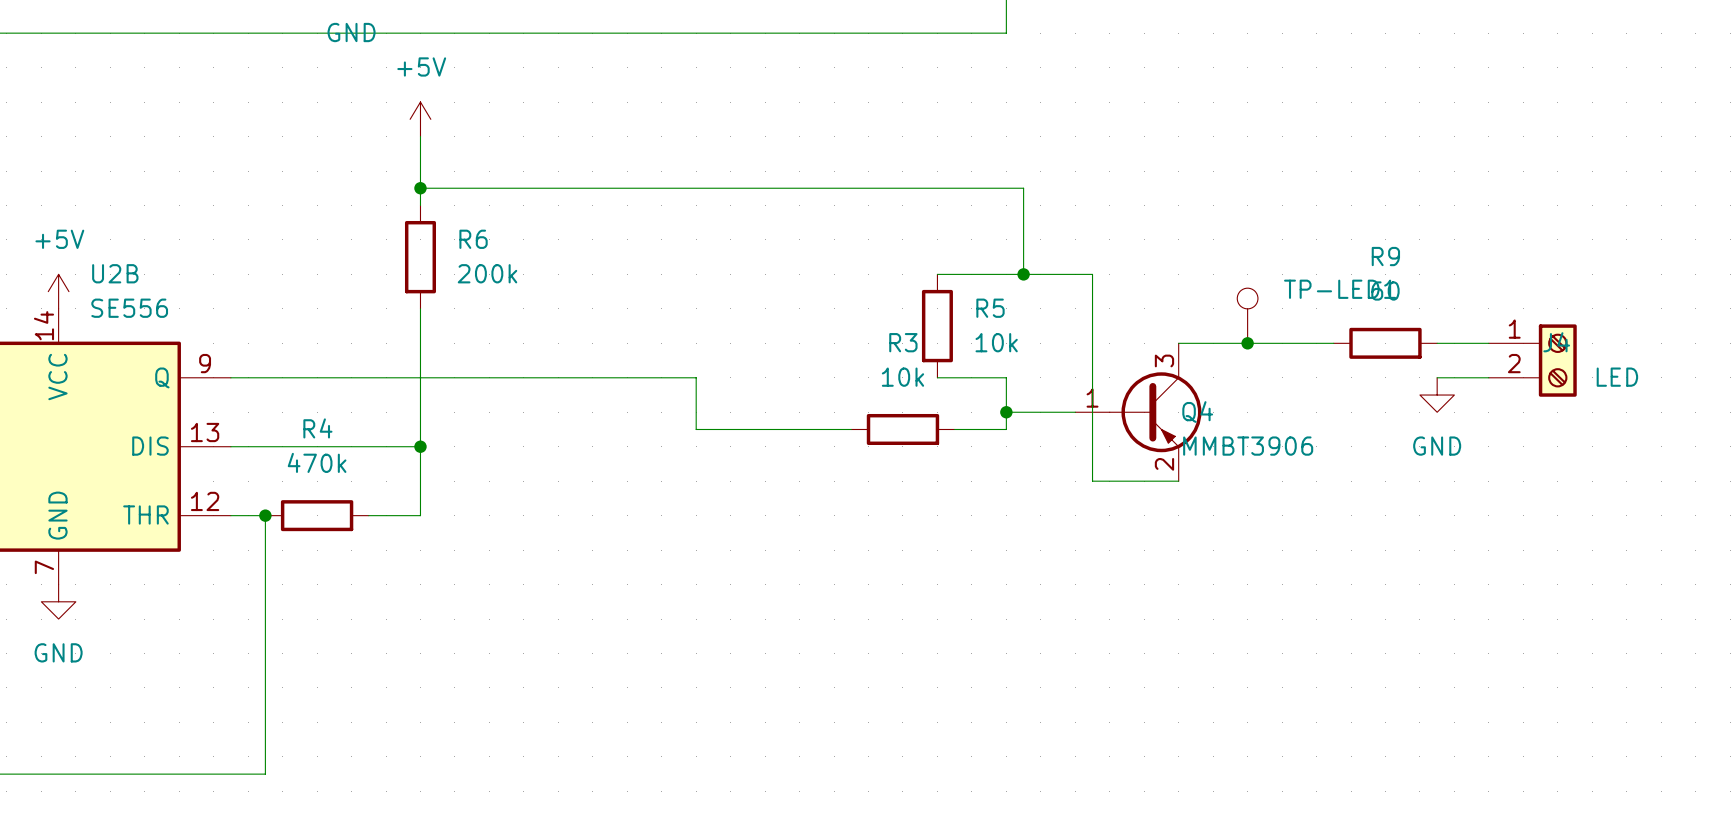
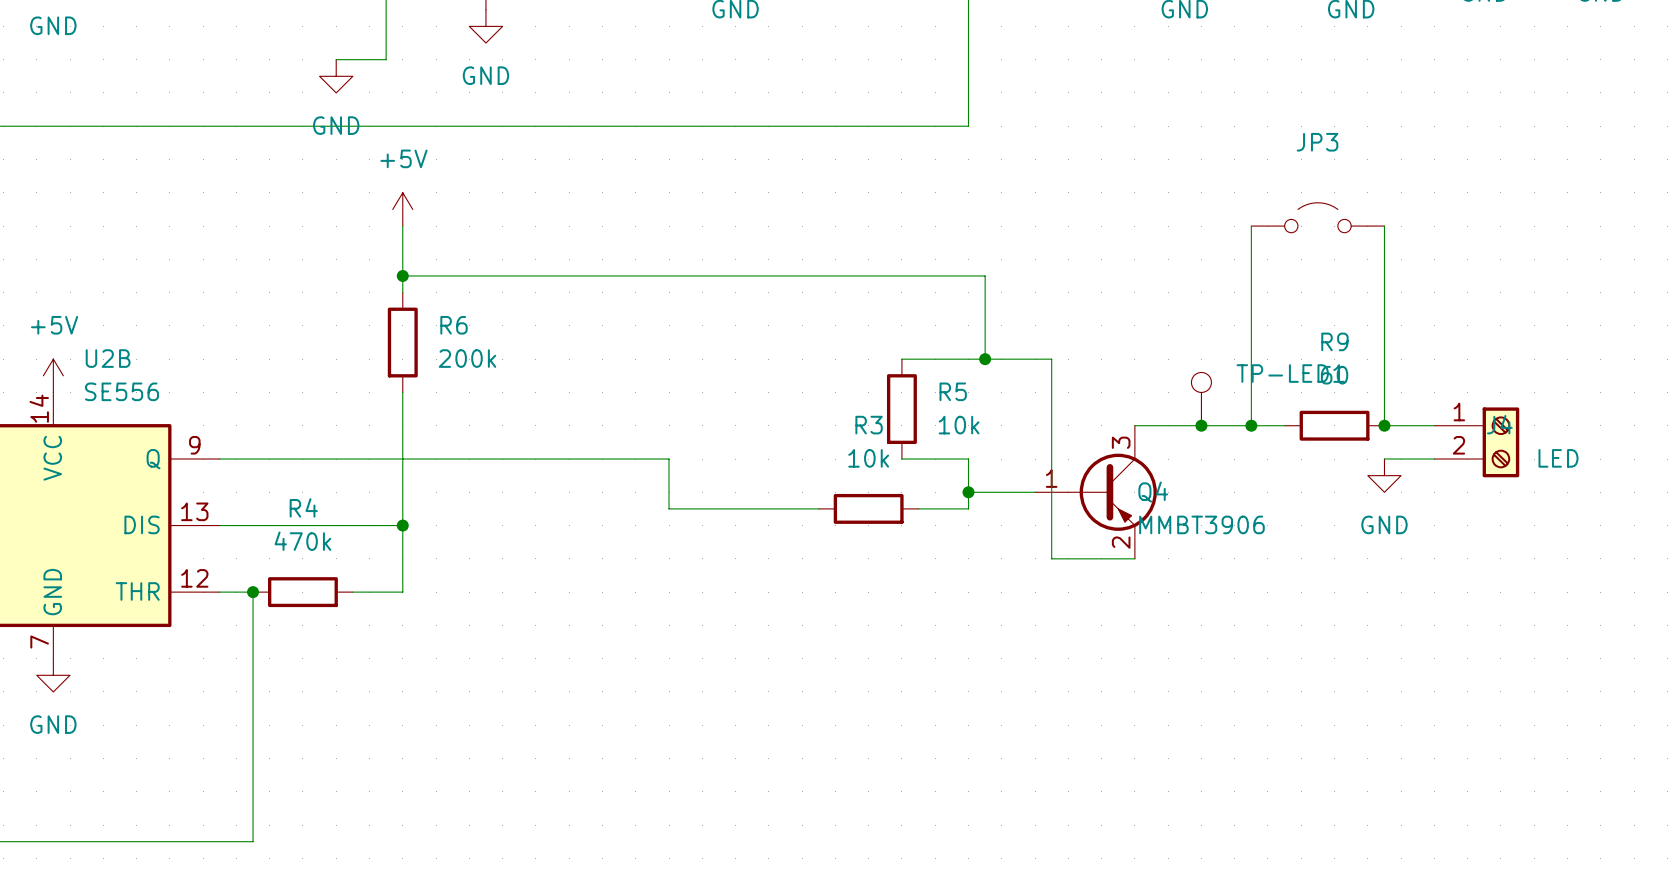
JP3: none -> (1317, 217)
wire: none -> (1251, 226) (1251, 425)
wire: none -> (1384, 226) (1384, 425)
junction: none -> (1251, 425)
junction: none -> (1384, 425)

